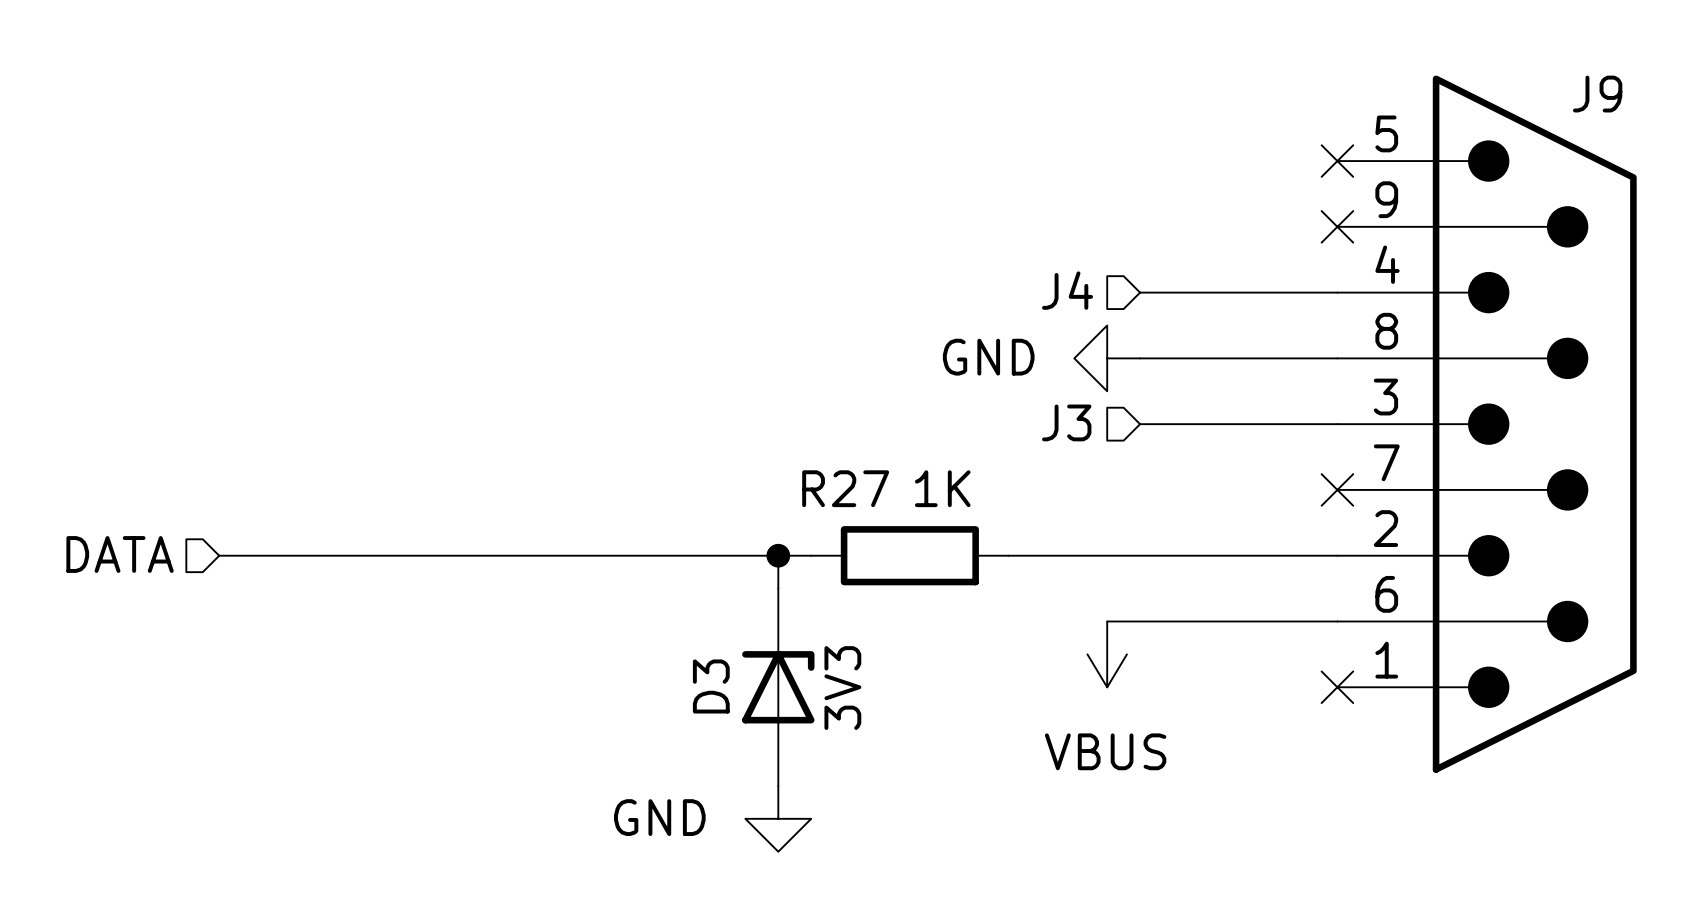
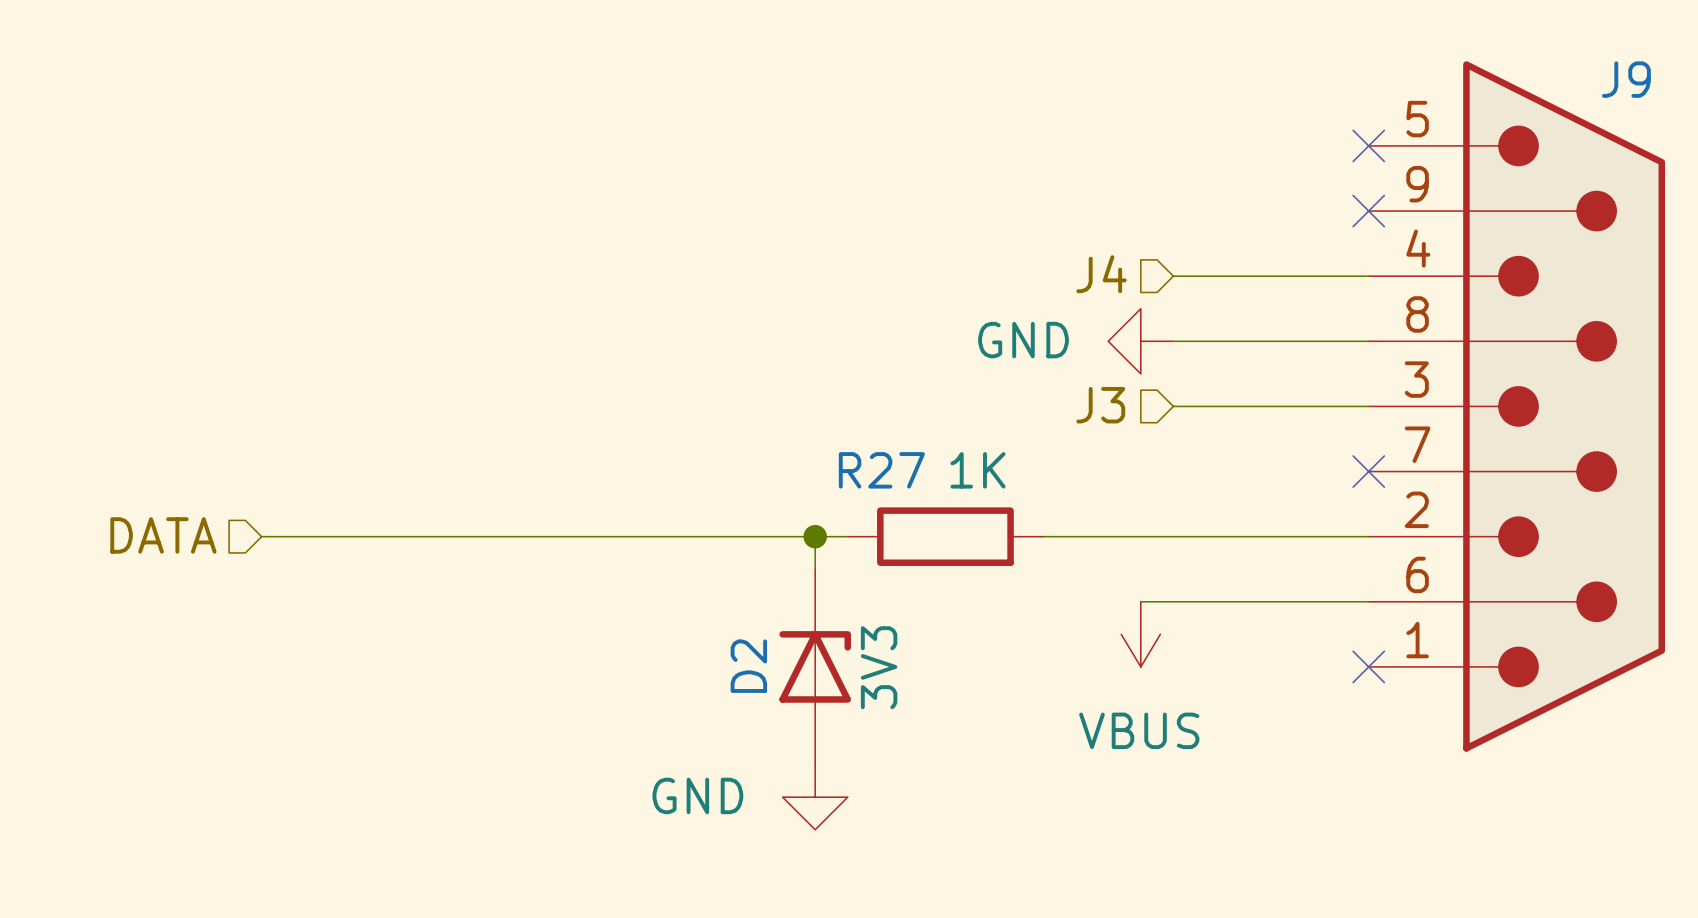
D3 name: D3 (711, 686) -> D2 (748, 666)

